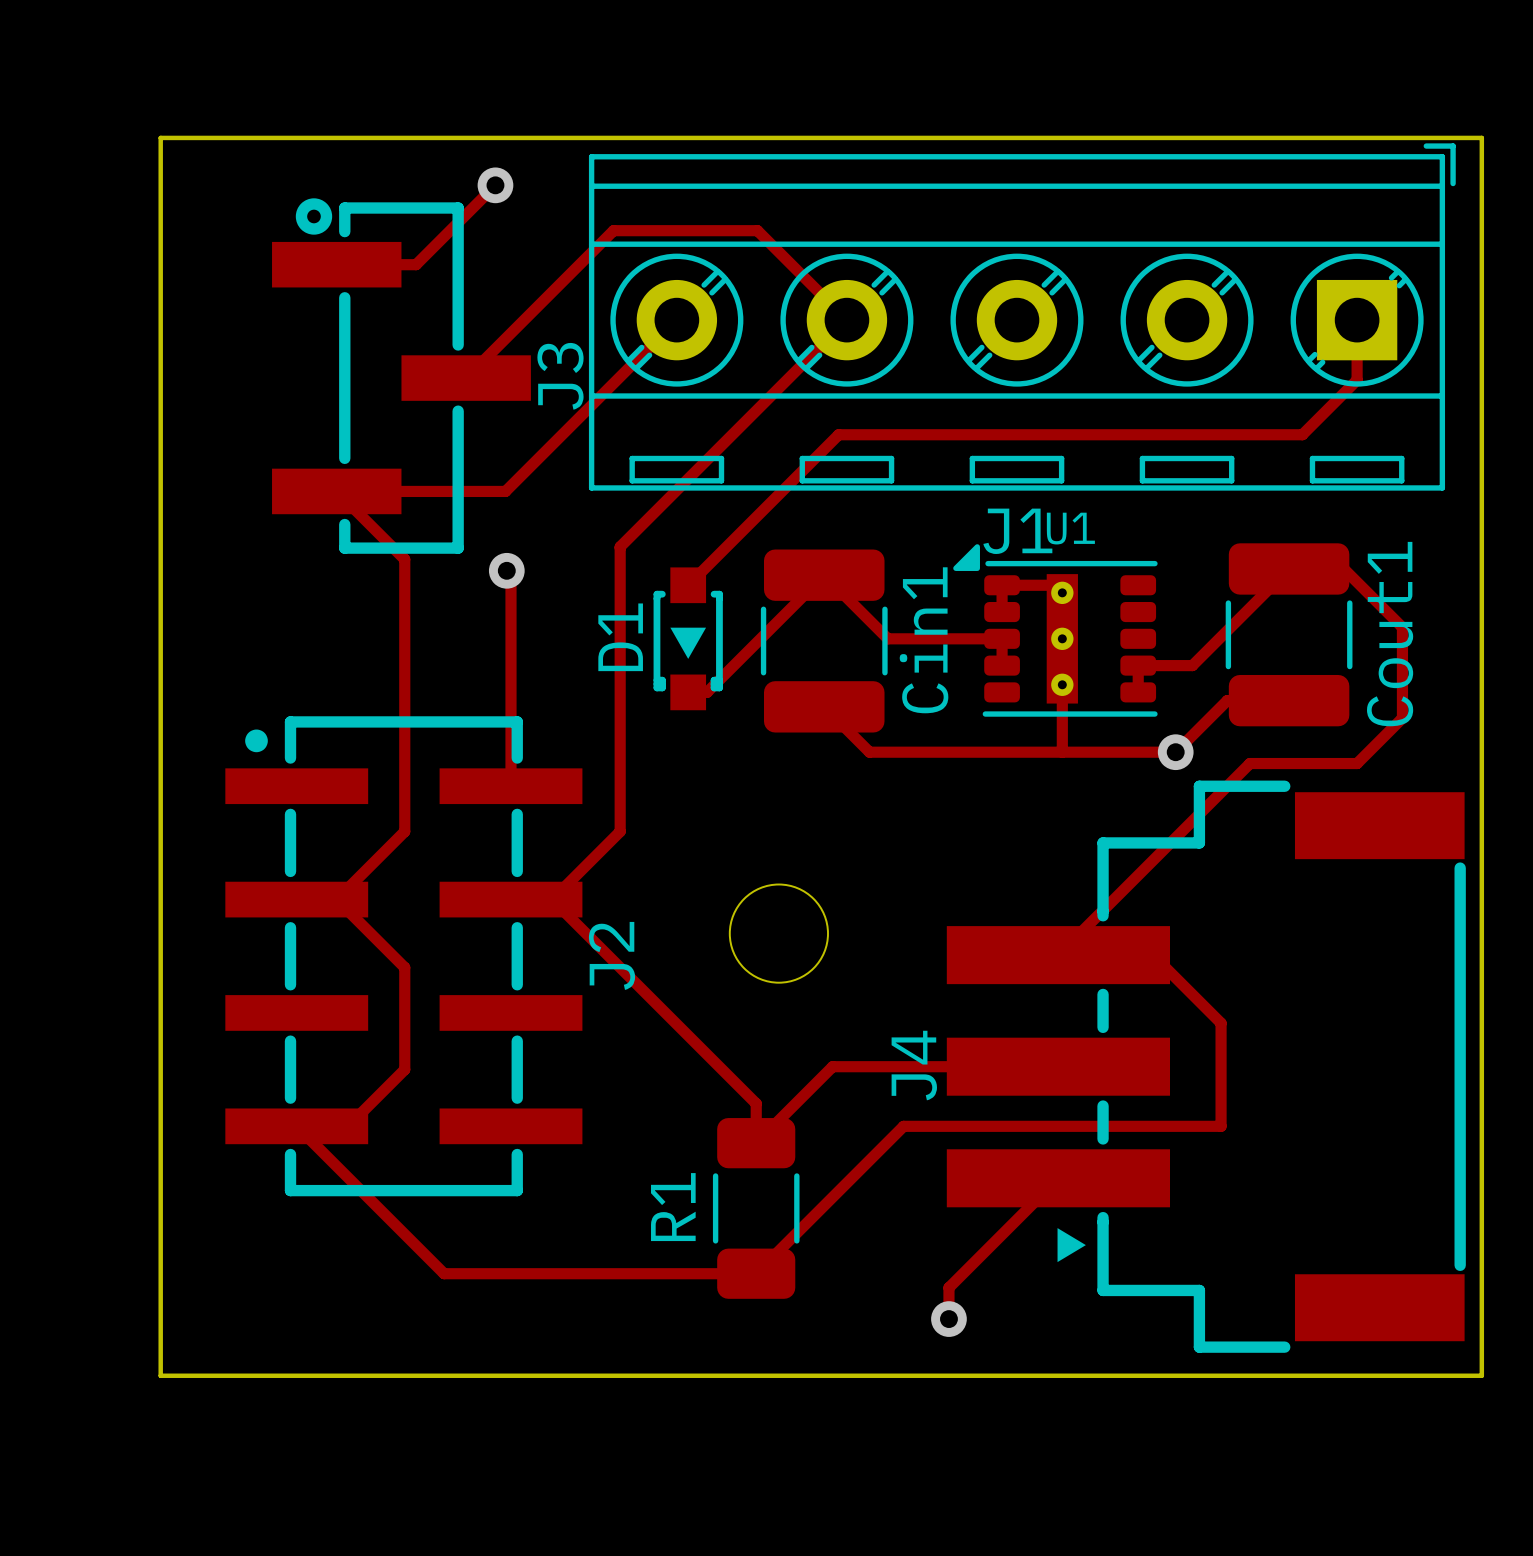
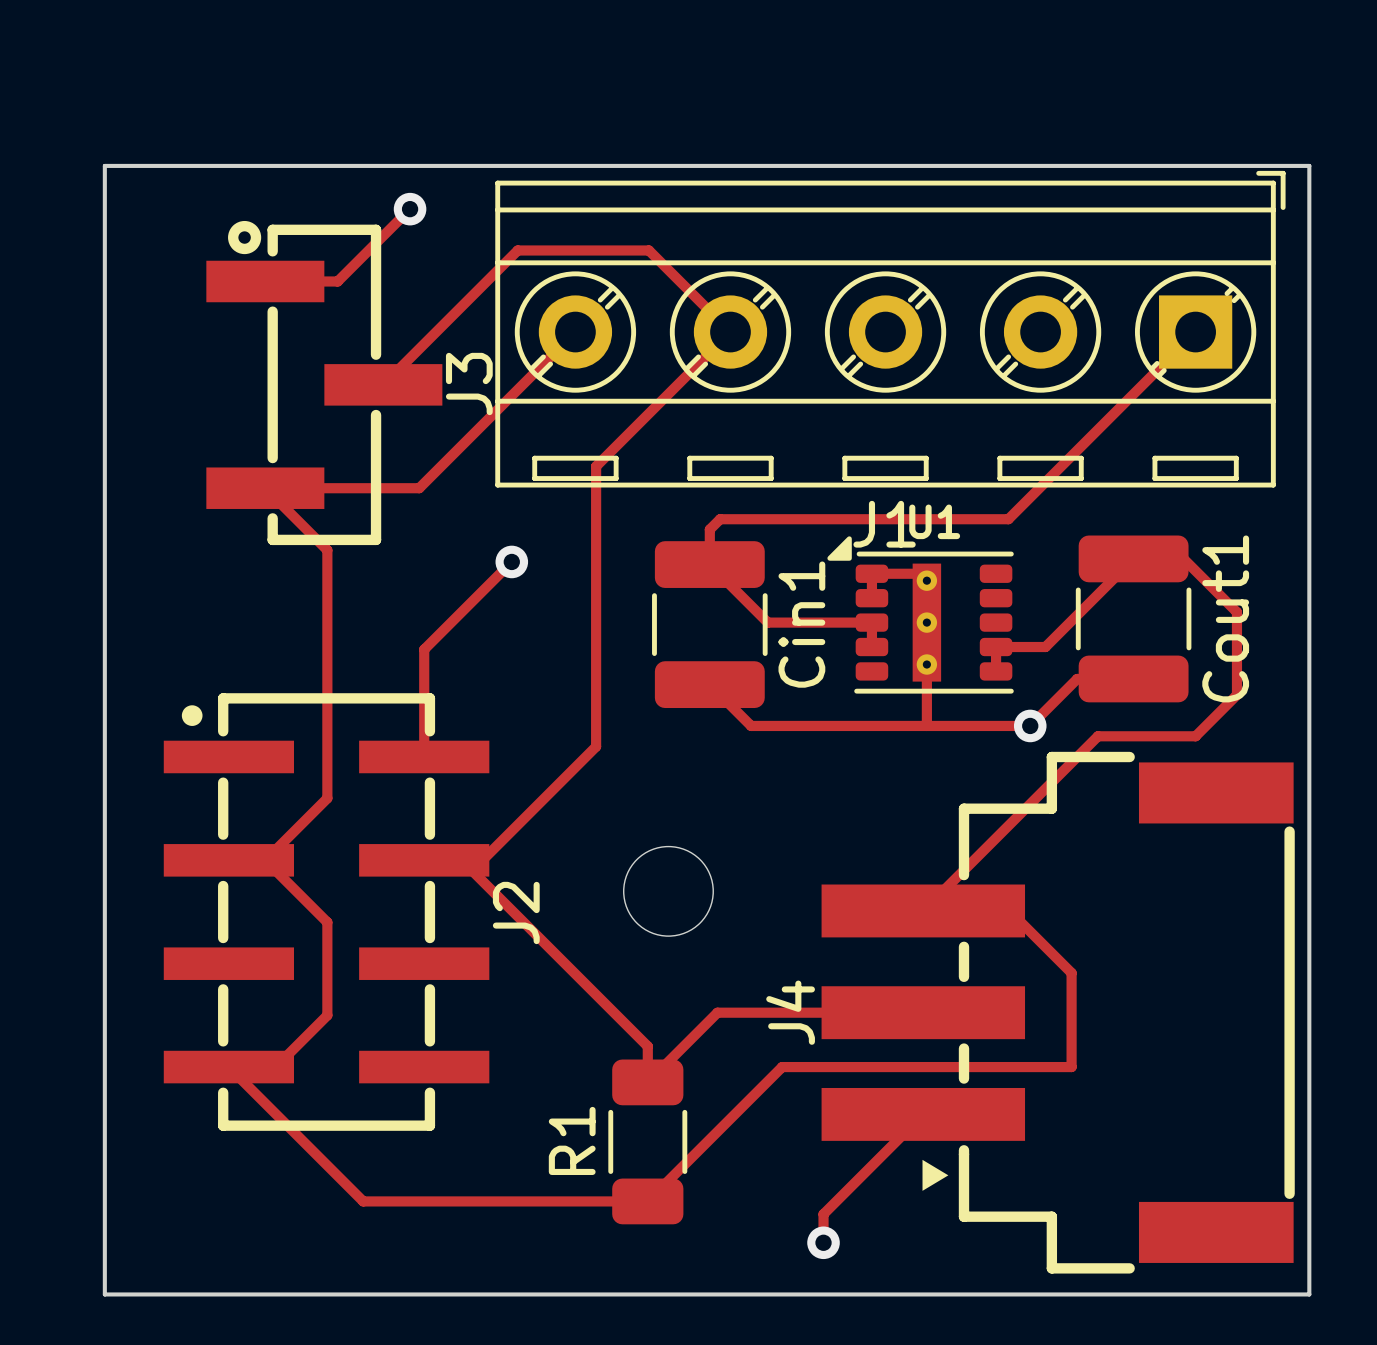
track: (1357, 320) (1357, 380) (1302, 434) (838, 434) (688, 585) -> (1195, 332) (1008, 519) (720, 519) (709, 529) (709, 564)
track: (699, 467) (620, 546) (620, 831) (552, 899) -> (596, 466) (596, 746) (482, 860) (461, 860)
track: (506, 570) (511, 575) (511, 668) -> (511, 561) (424, 649)
via position: (506, 570) -> (511, 561)
track: (824, 575) (707, 692) (688, 692) -> none
D1: (688, 638) -> none

